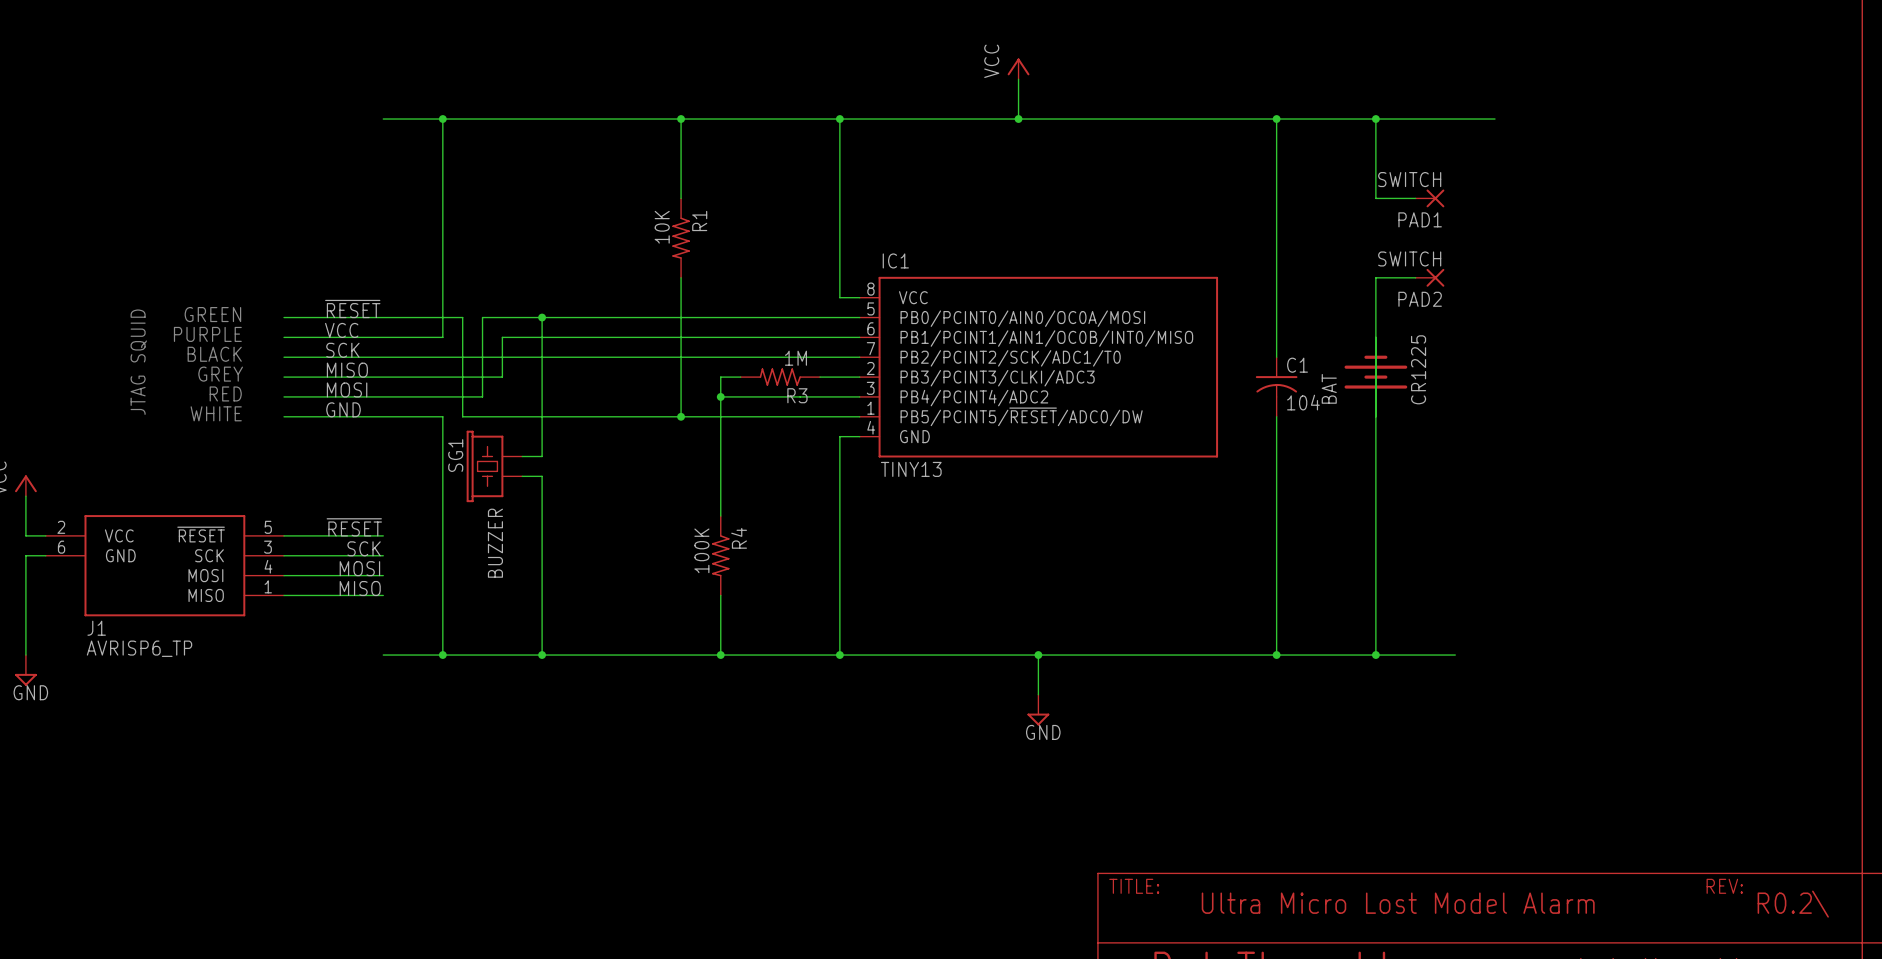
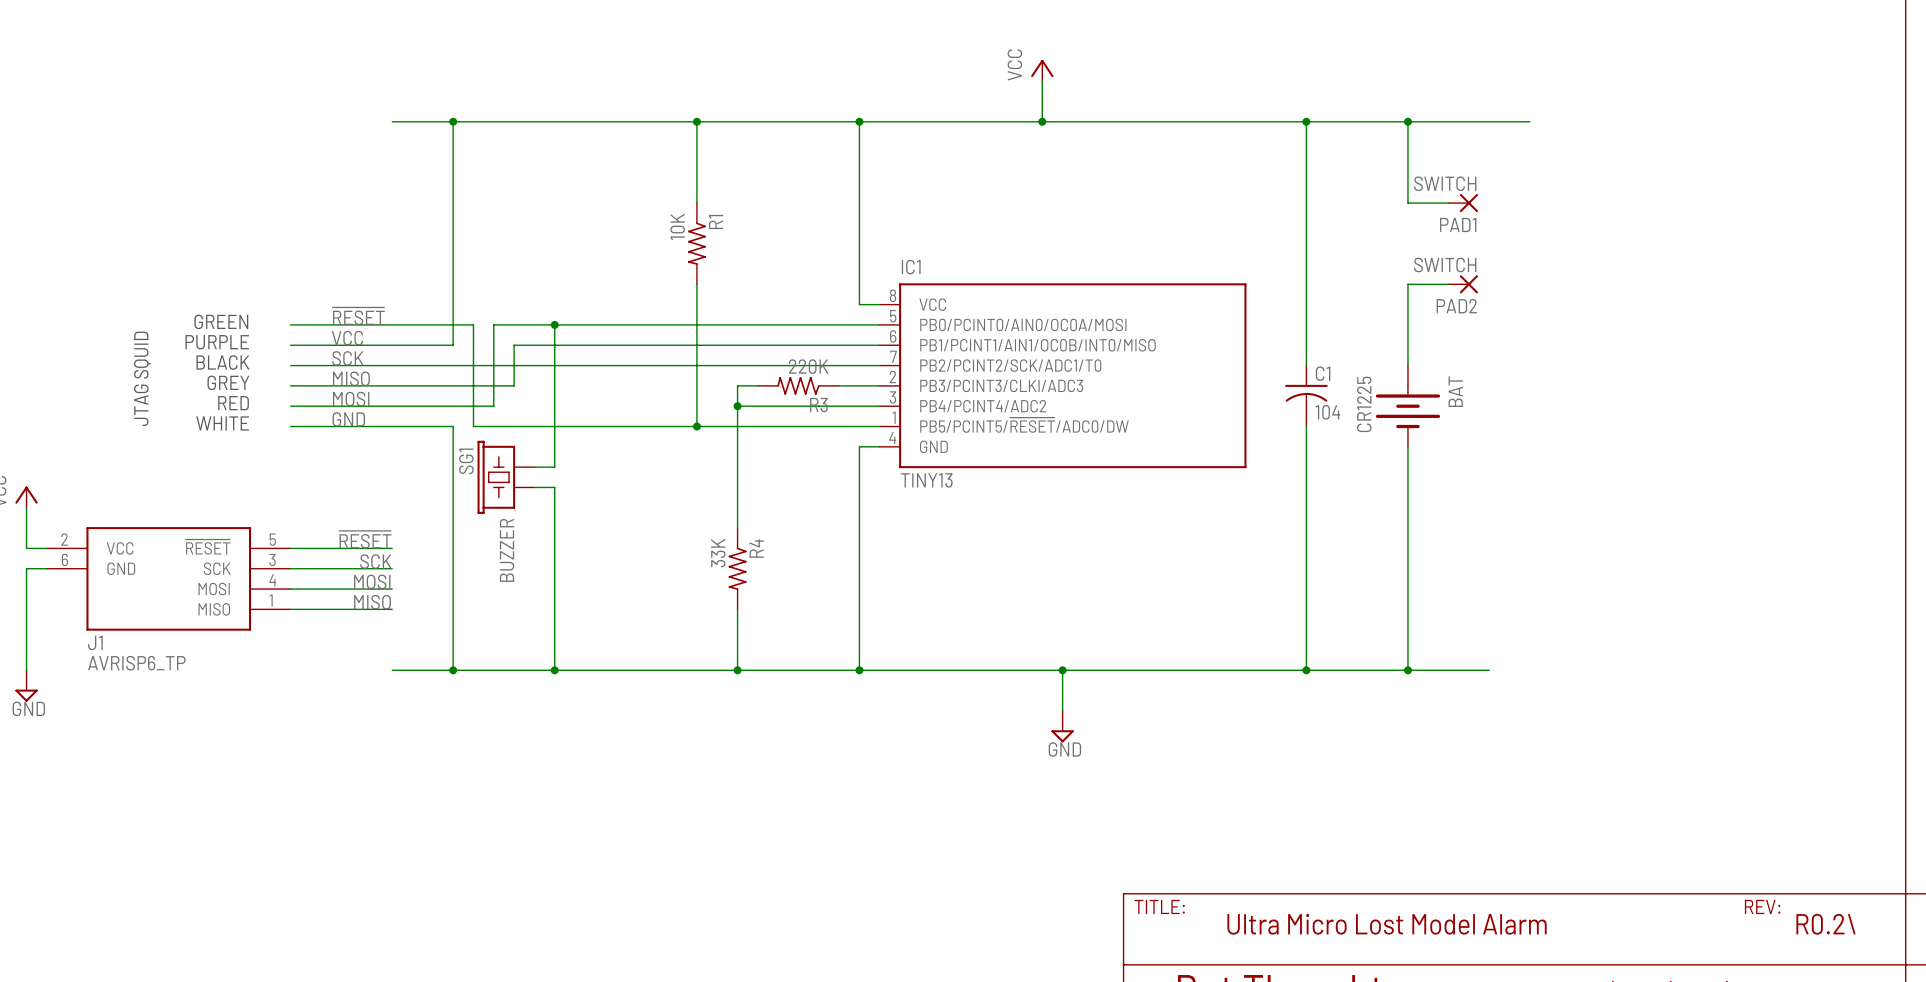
R3 value: 1M (795, 358) -> 220K (808, 366)
BAT rotation: 0° (1375, 376) -> 180° (1407, 406)
R4 value: 100K (701, 550) -> 33K (718, 553)

